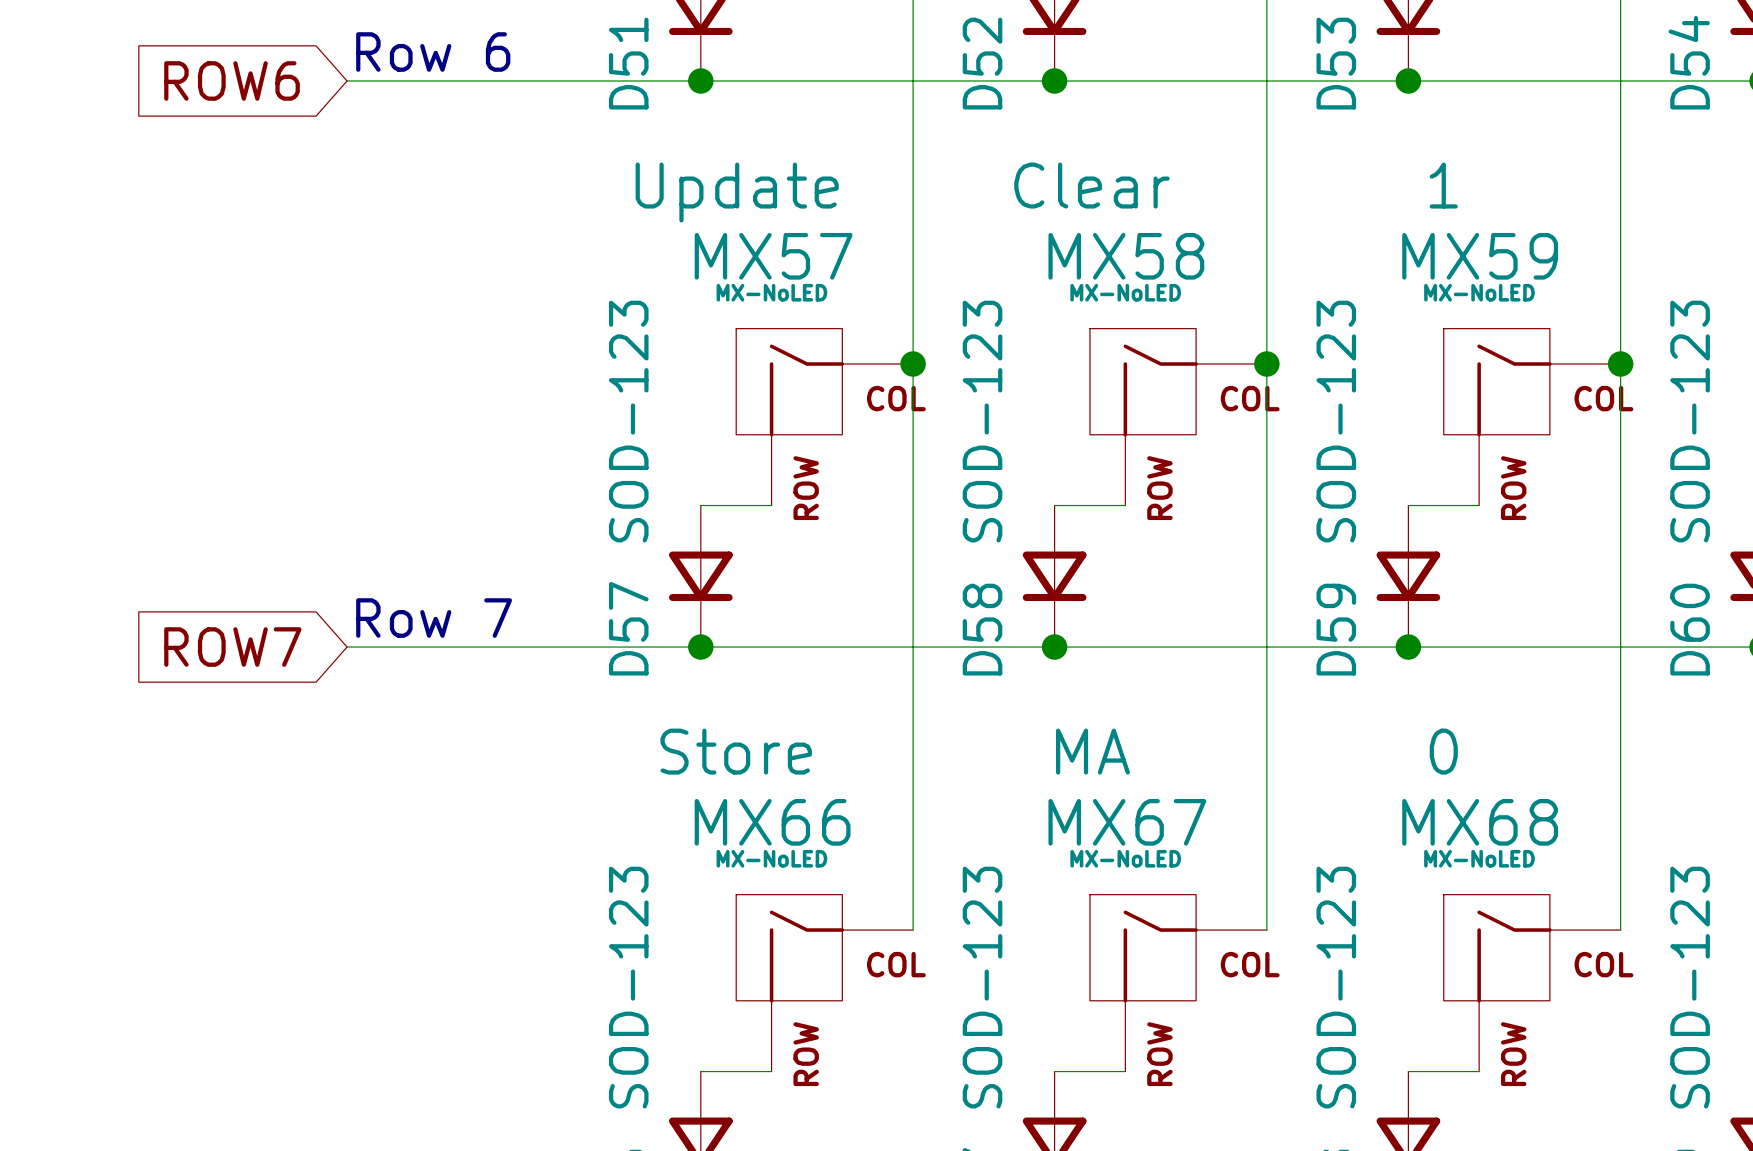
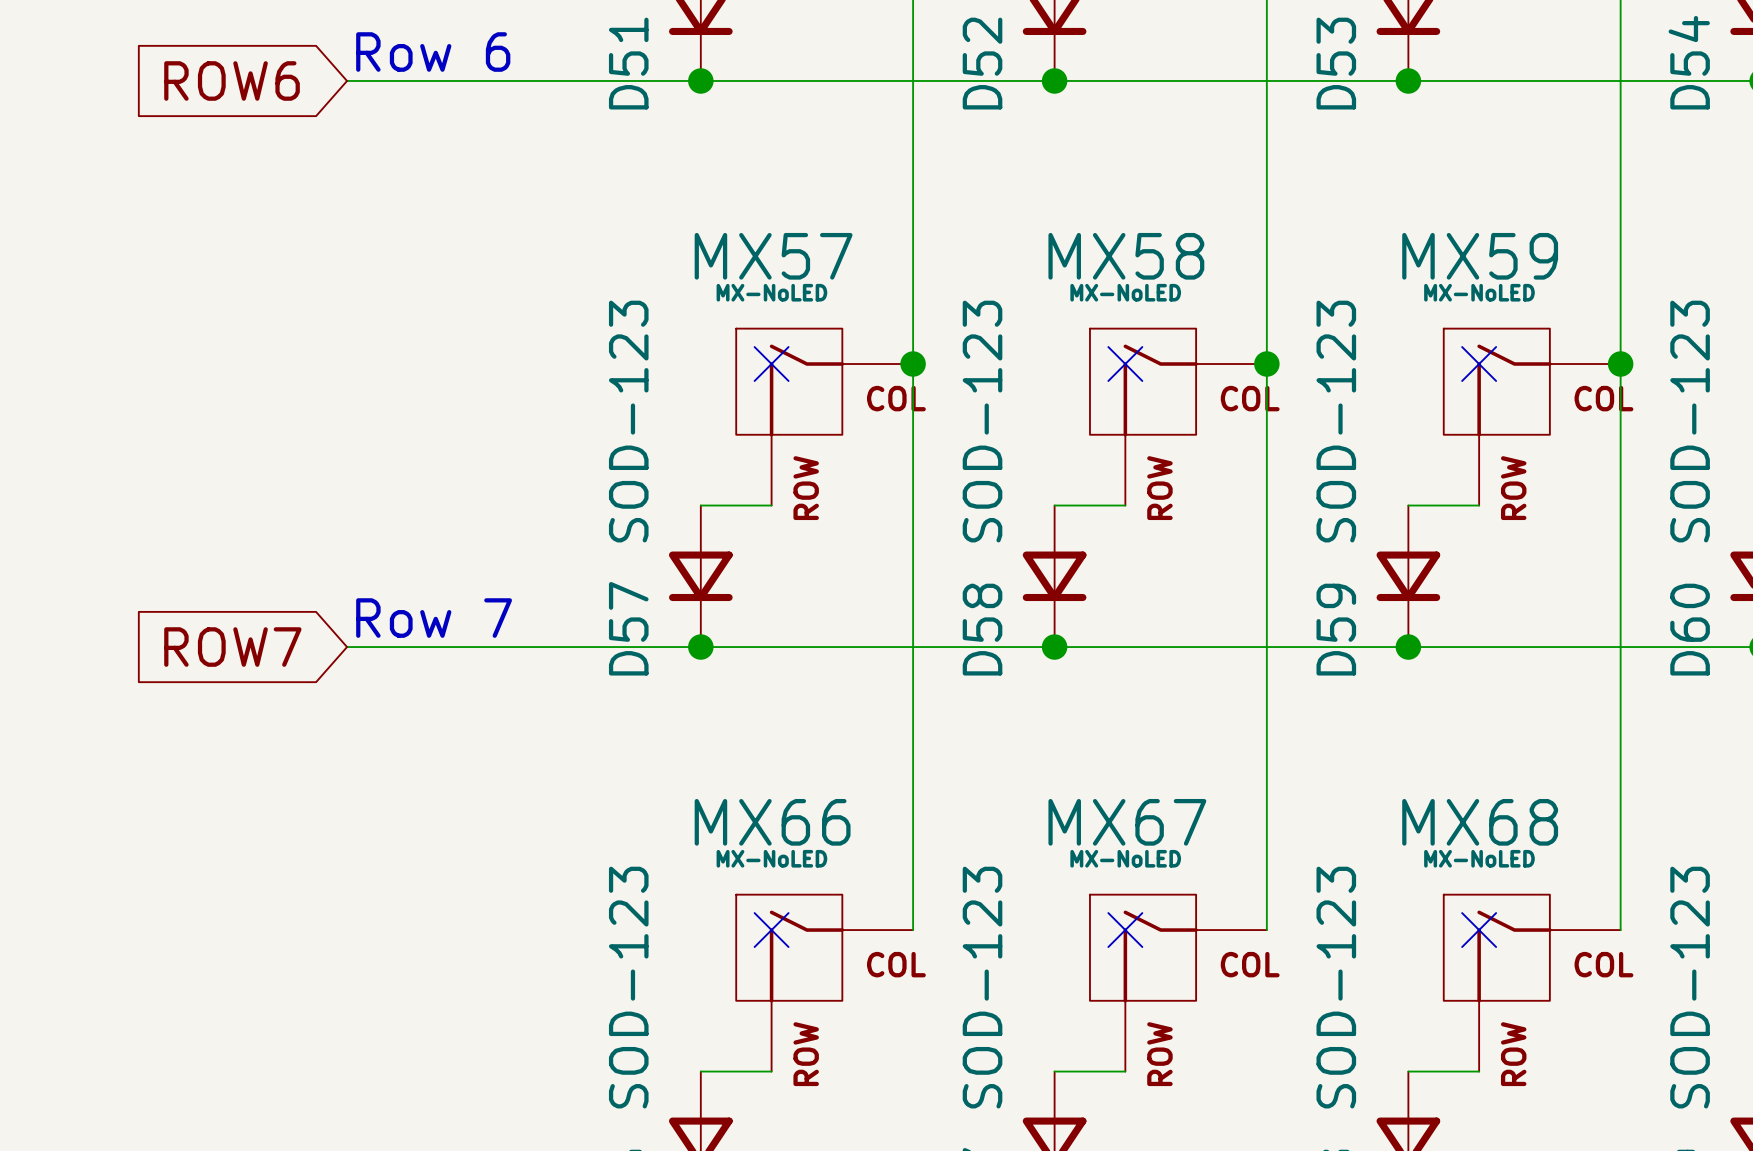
MX58 text: Clear (1091, 185) -> none
MX59 text: 1 (1443, 185) -> none
MX57 text: Update (737, 192) -> none
no-connect mark: none -> (771, 364)
no-connect mark: none -> (1125, 364)
no-connect mark: none -> (1479, 364)
MX66 text: Store (736, 751) -> none
MX67 text: MA (1092, 751) -> none
MX68 text: 0 (1443, 751) -> none
no-connect mark: none -> (771, 930)
no-connect mark: none -> (1125, 930)
no-connect mark: none -> (1479, 930)

